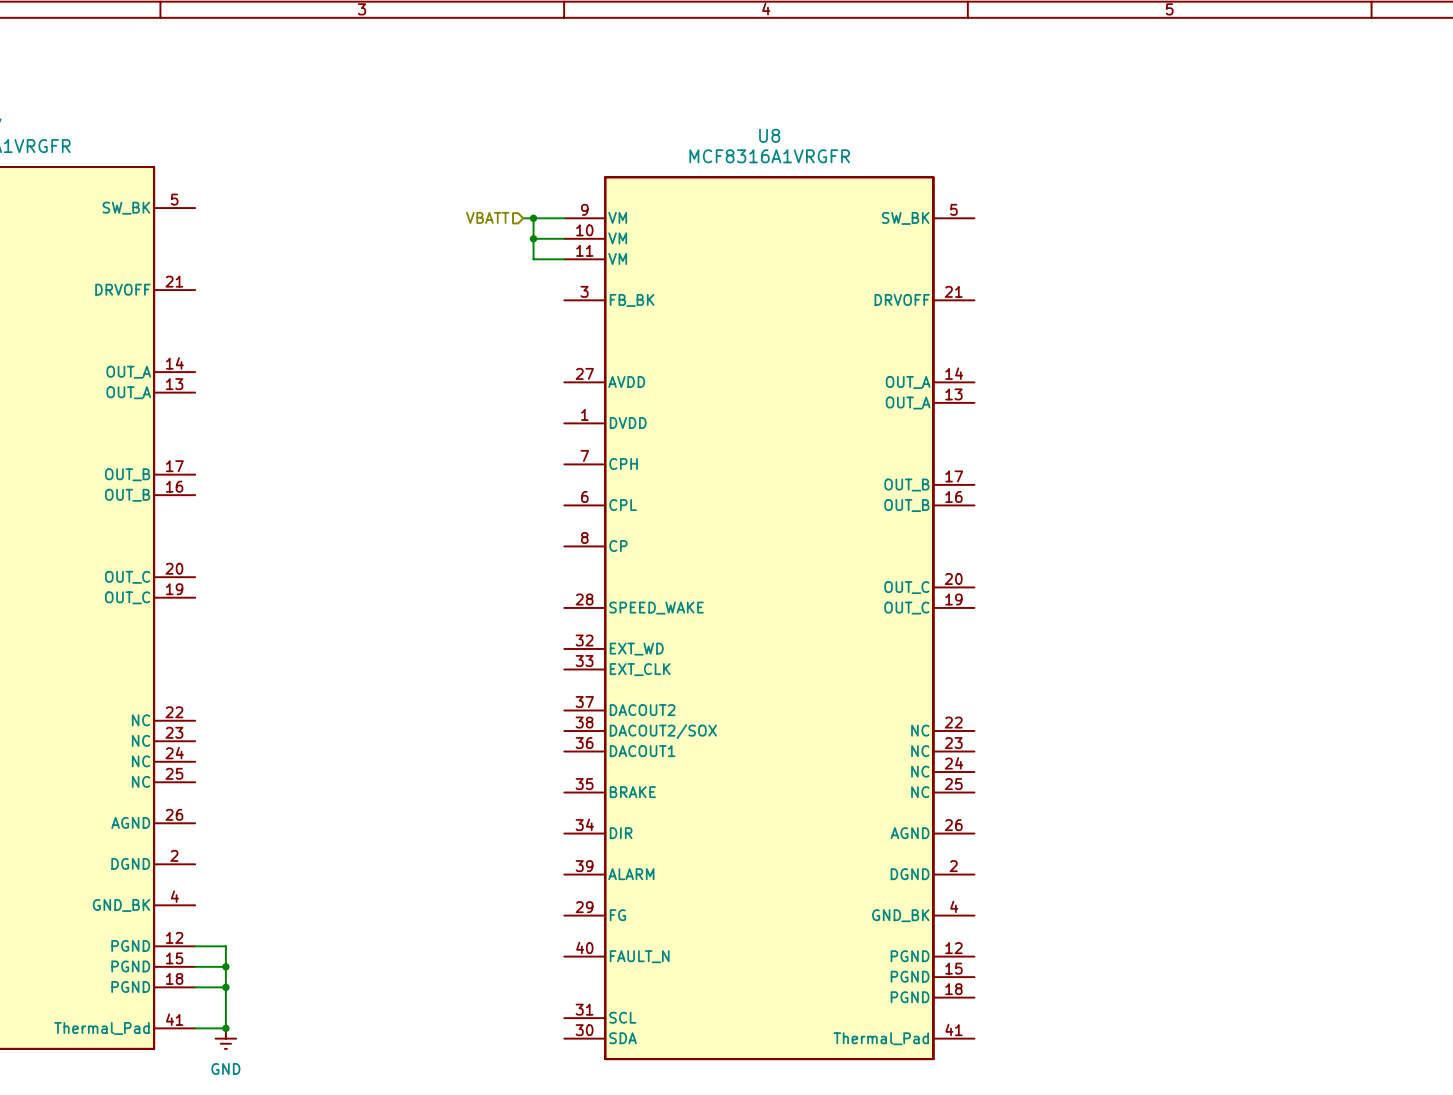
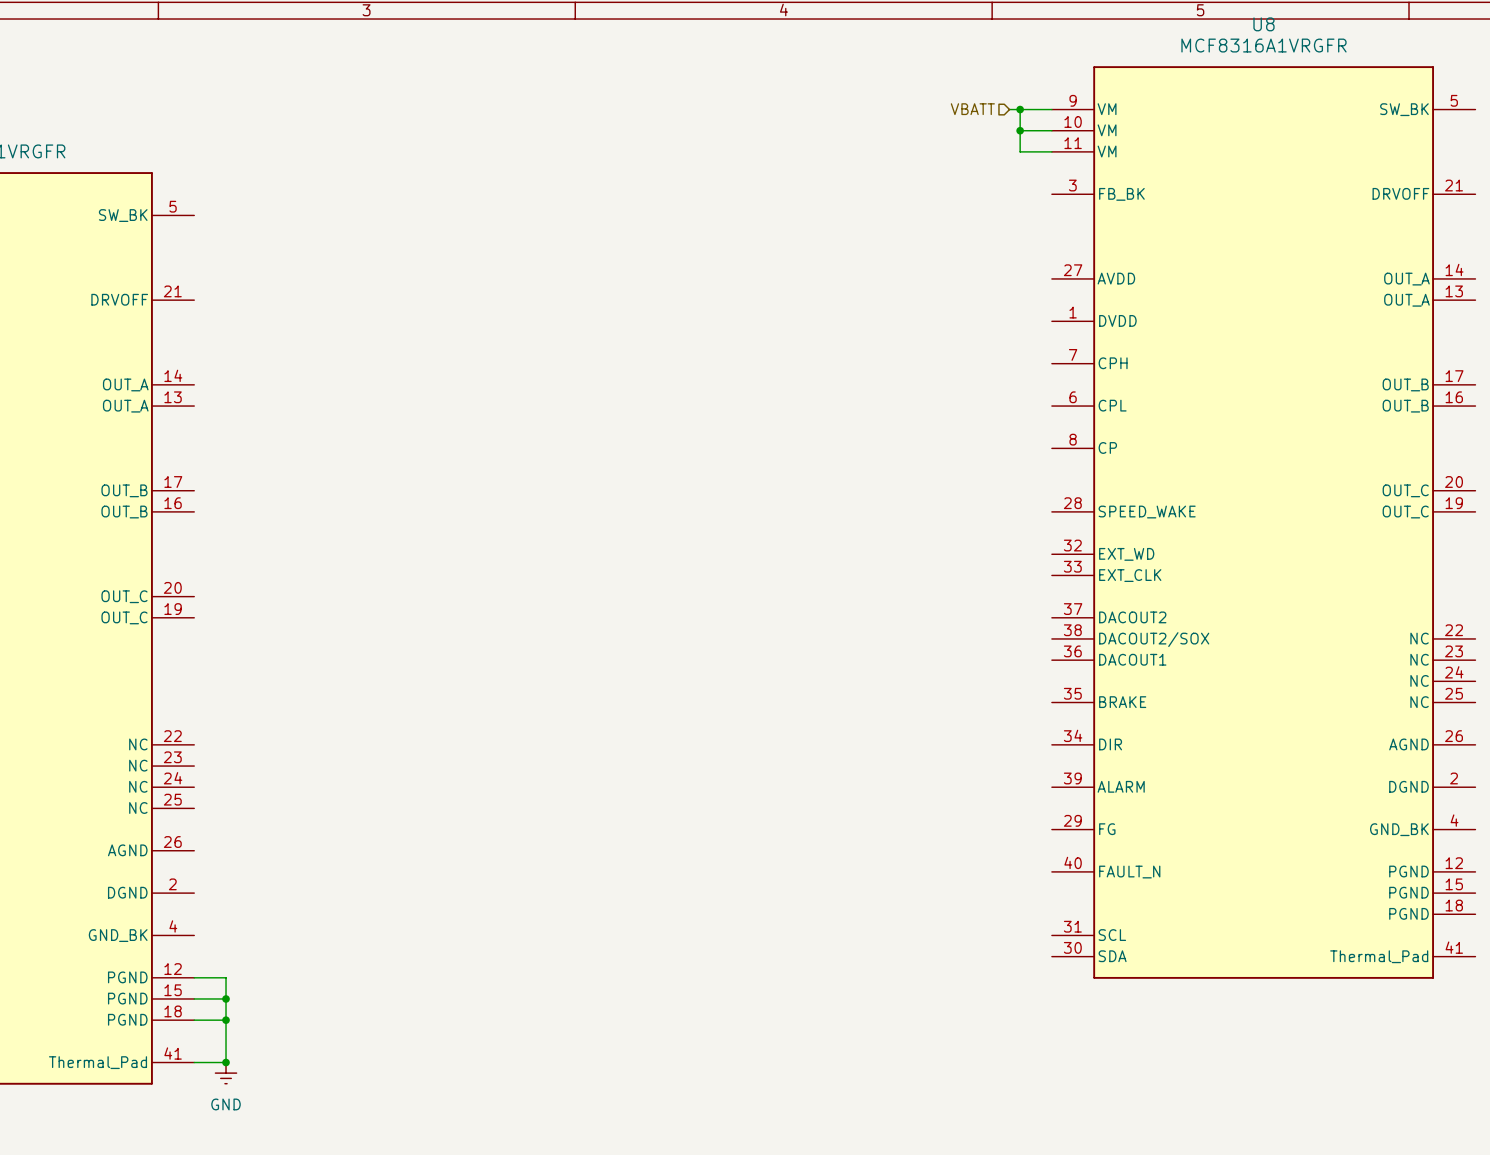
hierarchical label: none -> VBATT (972, 109)
wire: none -> (1009, 109) (1051, 109)
wire: none -> (1020, 109) (1020, 151) (1051, 151)
junction: none -> (1020, 109)
wire: none -> (1020, 130) (1051, 130)
junction: none -> (1020, 130)
hierarchical label: VBATT (487, 217) -> none
wire: (523, 218) (564, 218) -> none
wire: (533, 218) (533, 259) (564, 259) -> none
junction: (533, 218) -> none
wire: (533, 238) (564, 238) -> none
junction: (533, 238) -> none
U8 position: (769, 618) -> (1263, 522)

